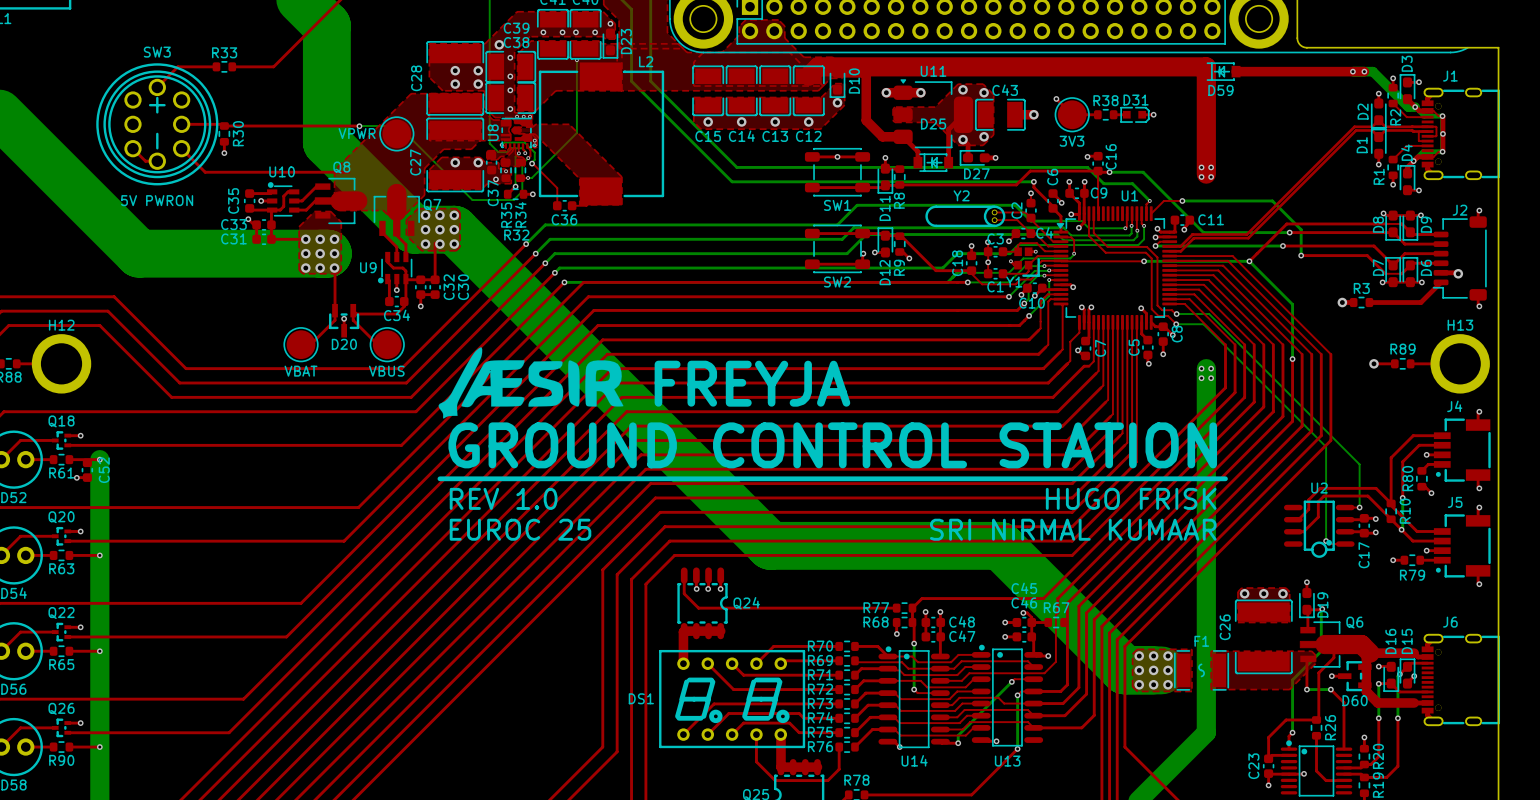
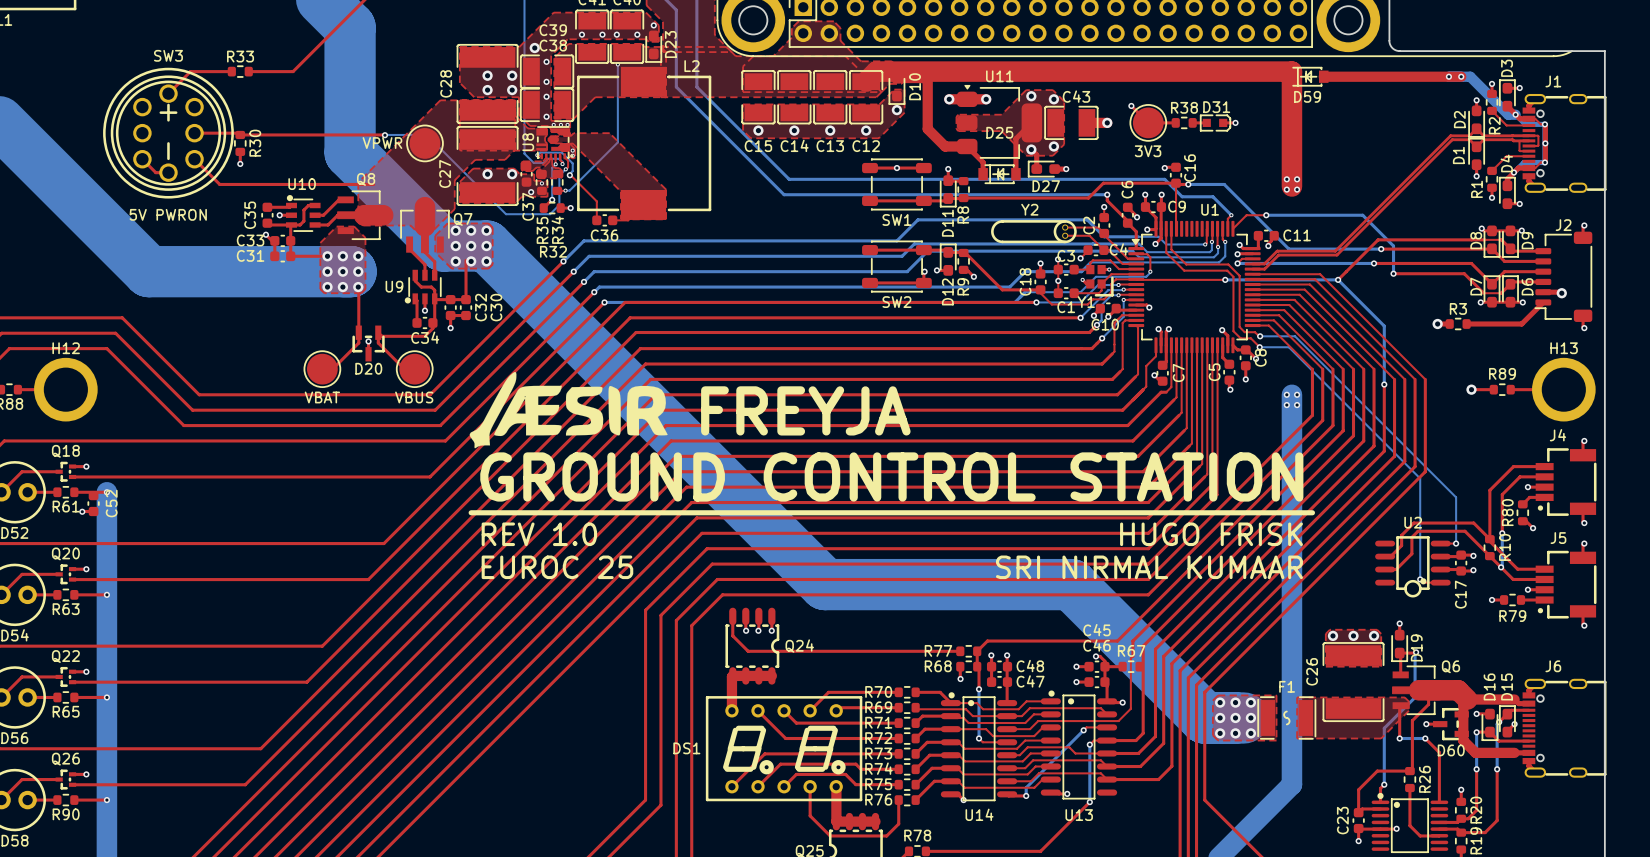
J1 footprint: [1421, 87, 1501, 181] -> [1522, 93, 1607, 193]
J6 footprint: [1421, 633, 1501, 727] -> [1522, 678, 1607, 778]

